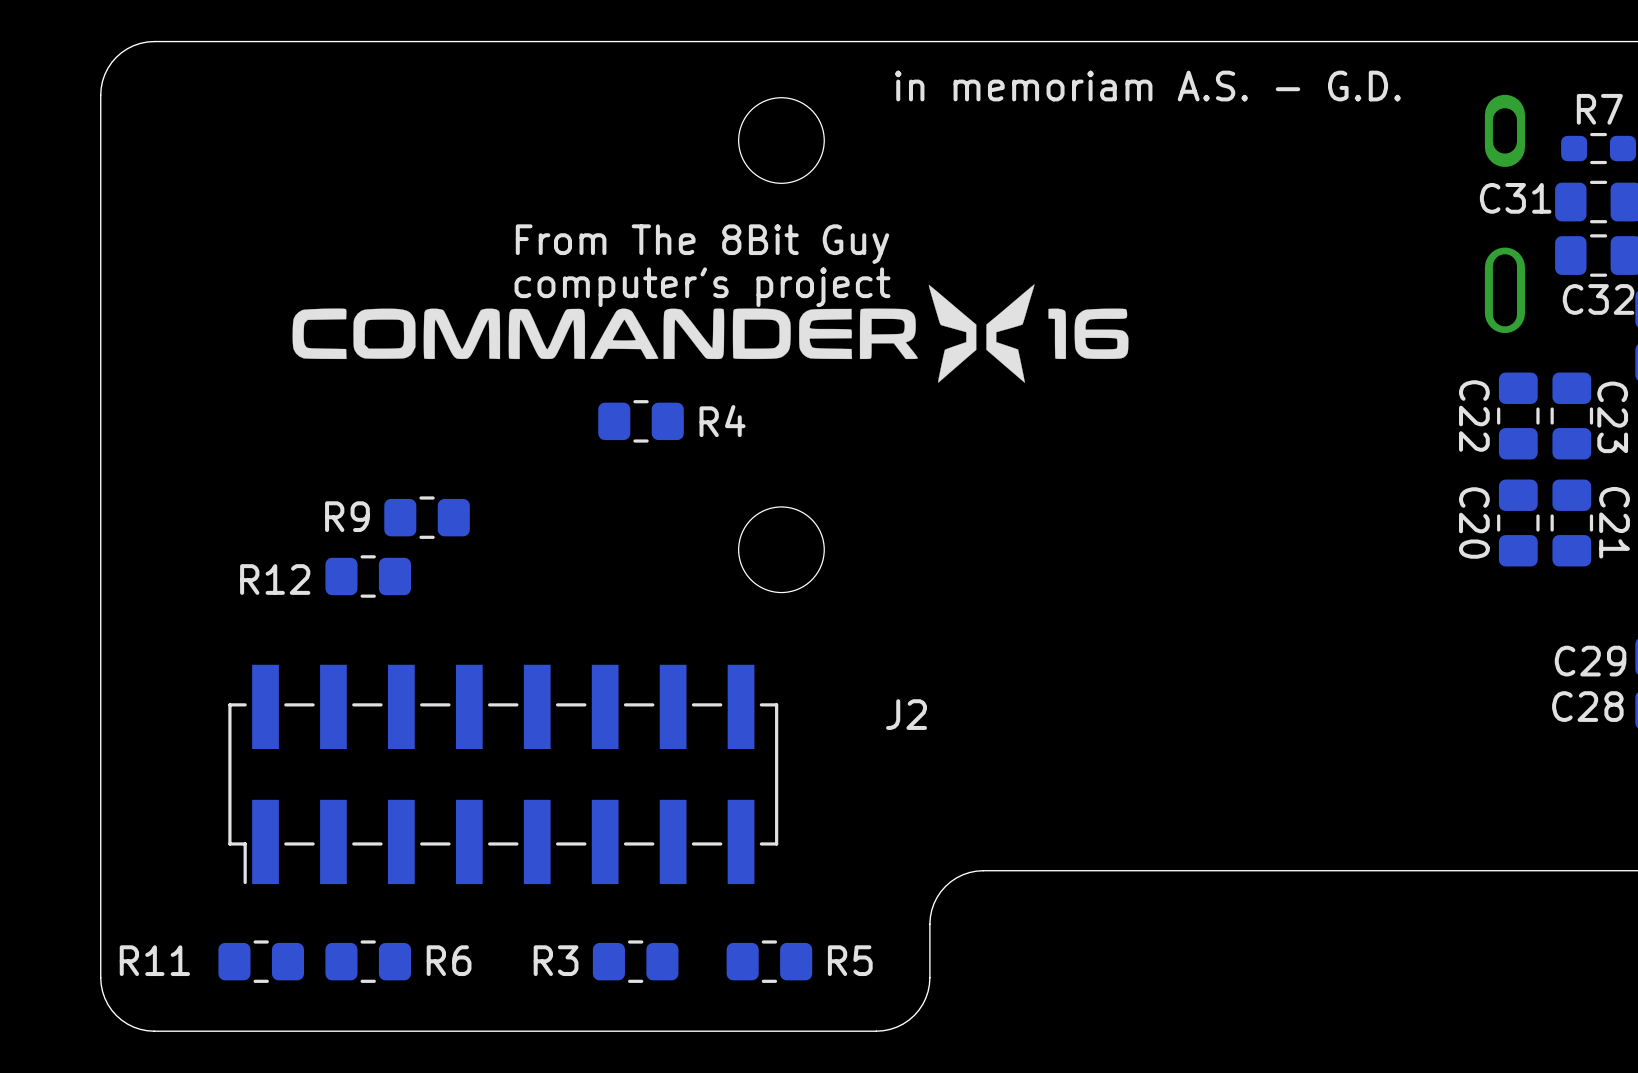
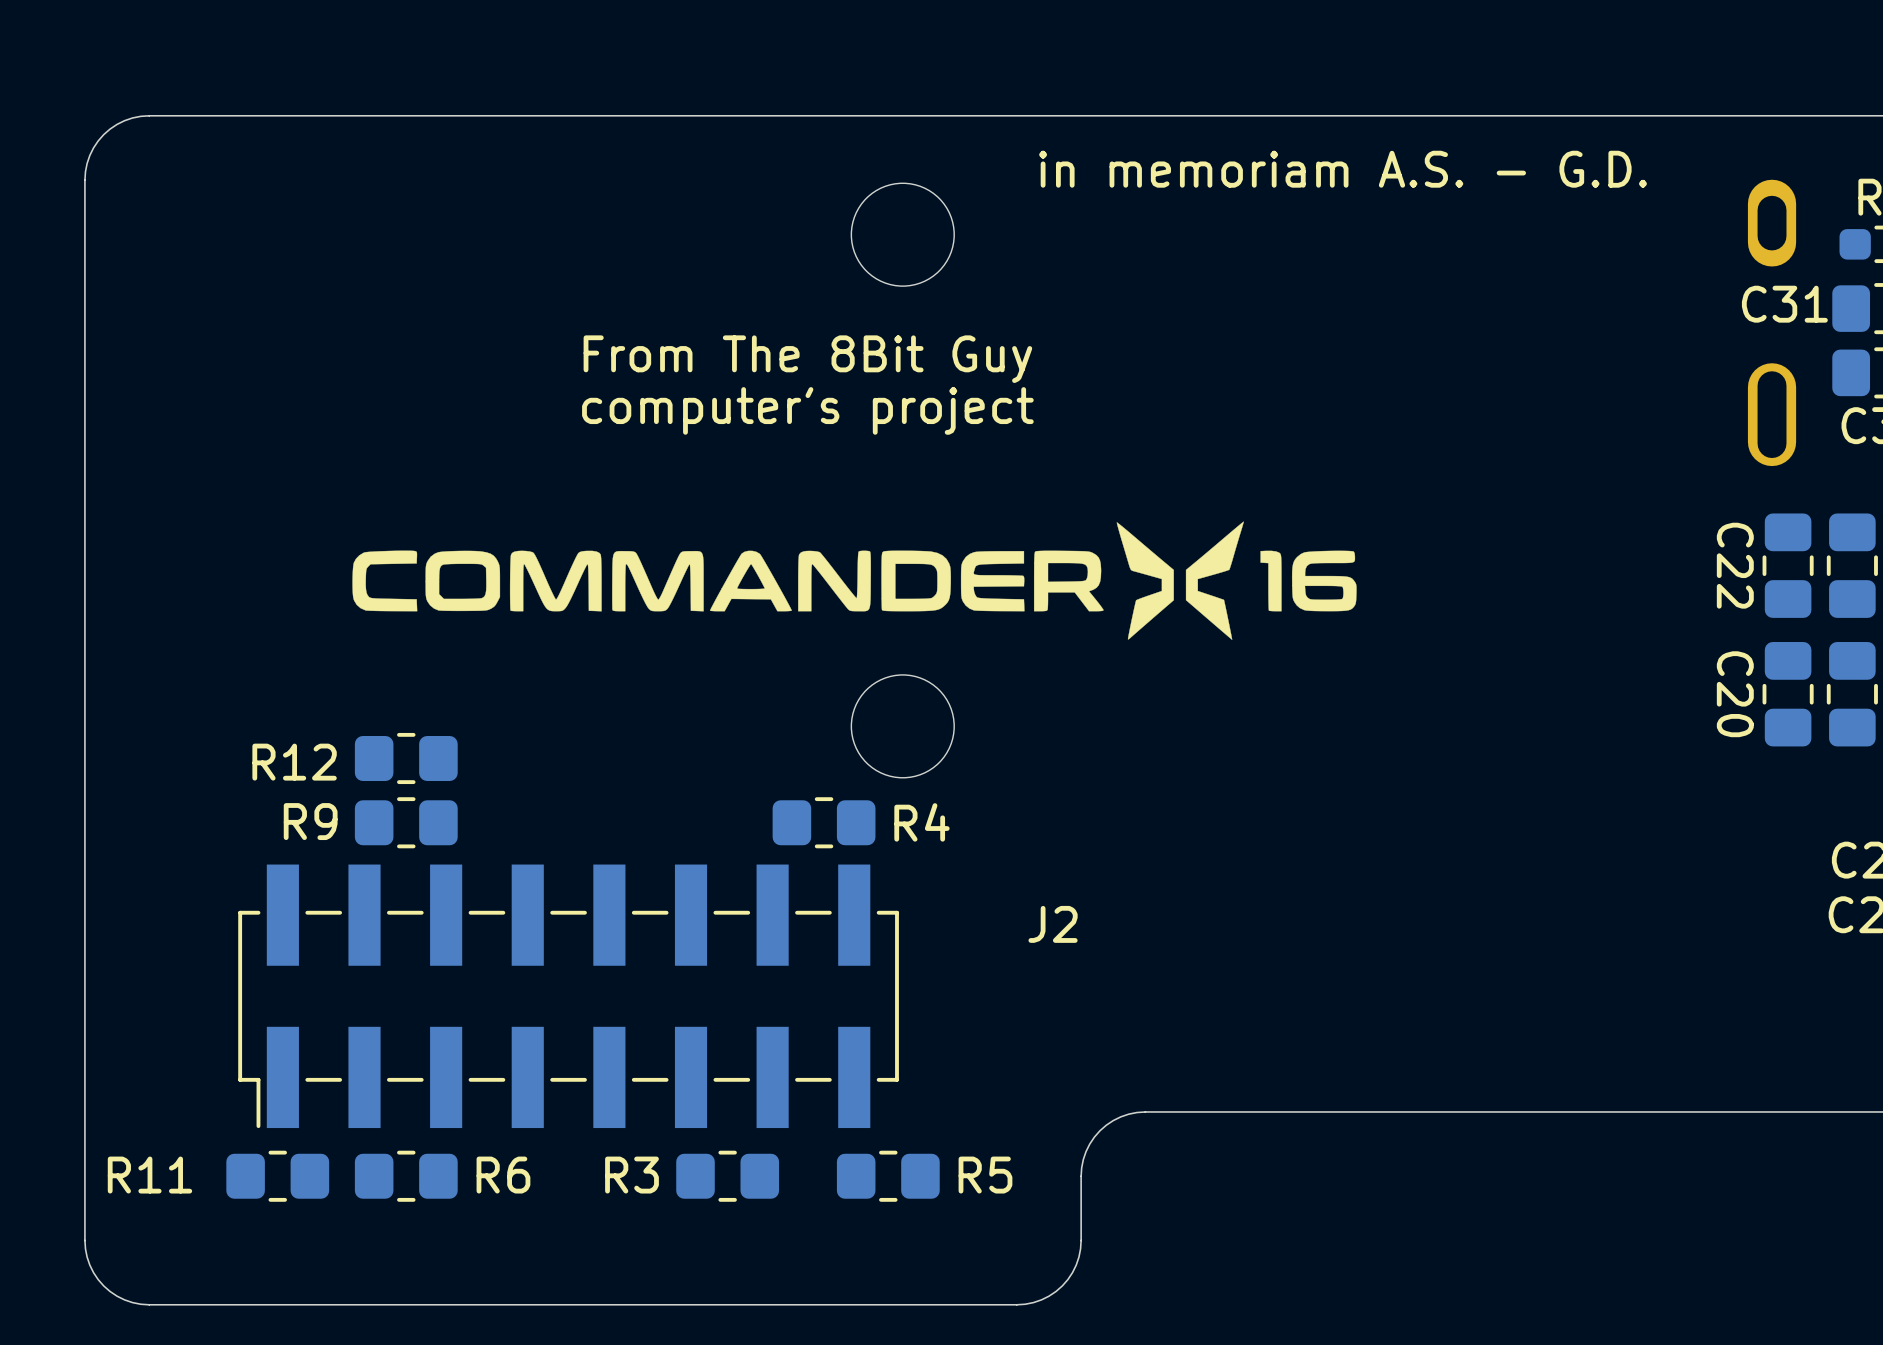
drawing position: (710, 333) -> (854, 580)
R4 position: (641, 421) -> (824, 822)
R9 position: (427, 517) -> (406, 822)
R11 position: (261, 961) -> (277, 1176)
R6 position: (368, 961) -> (406, 1176)
R3 position: (635, 961) -> (727, 1176)
R5 position: (769, 961) -> (888, 1176)

